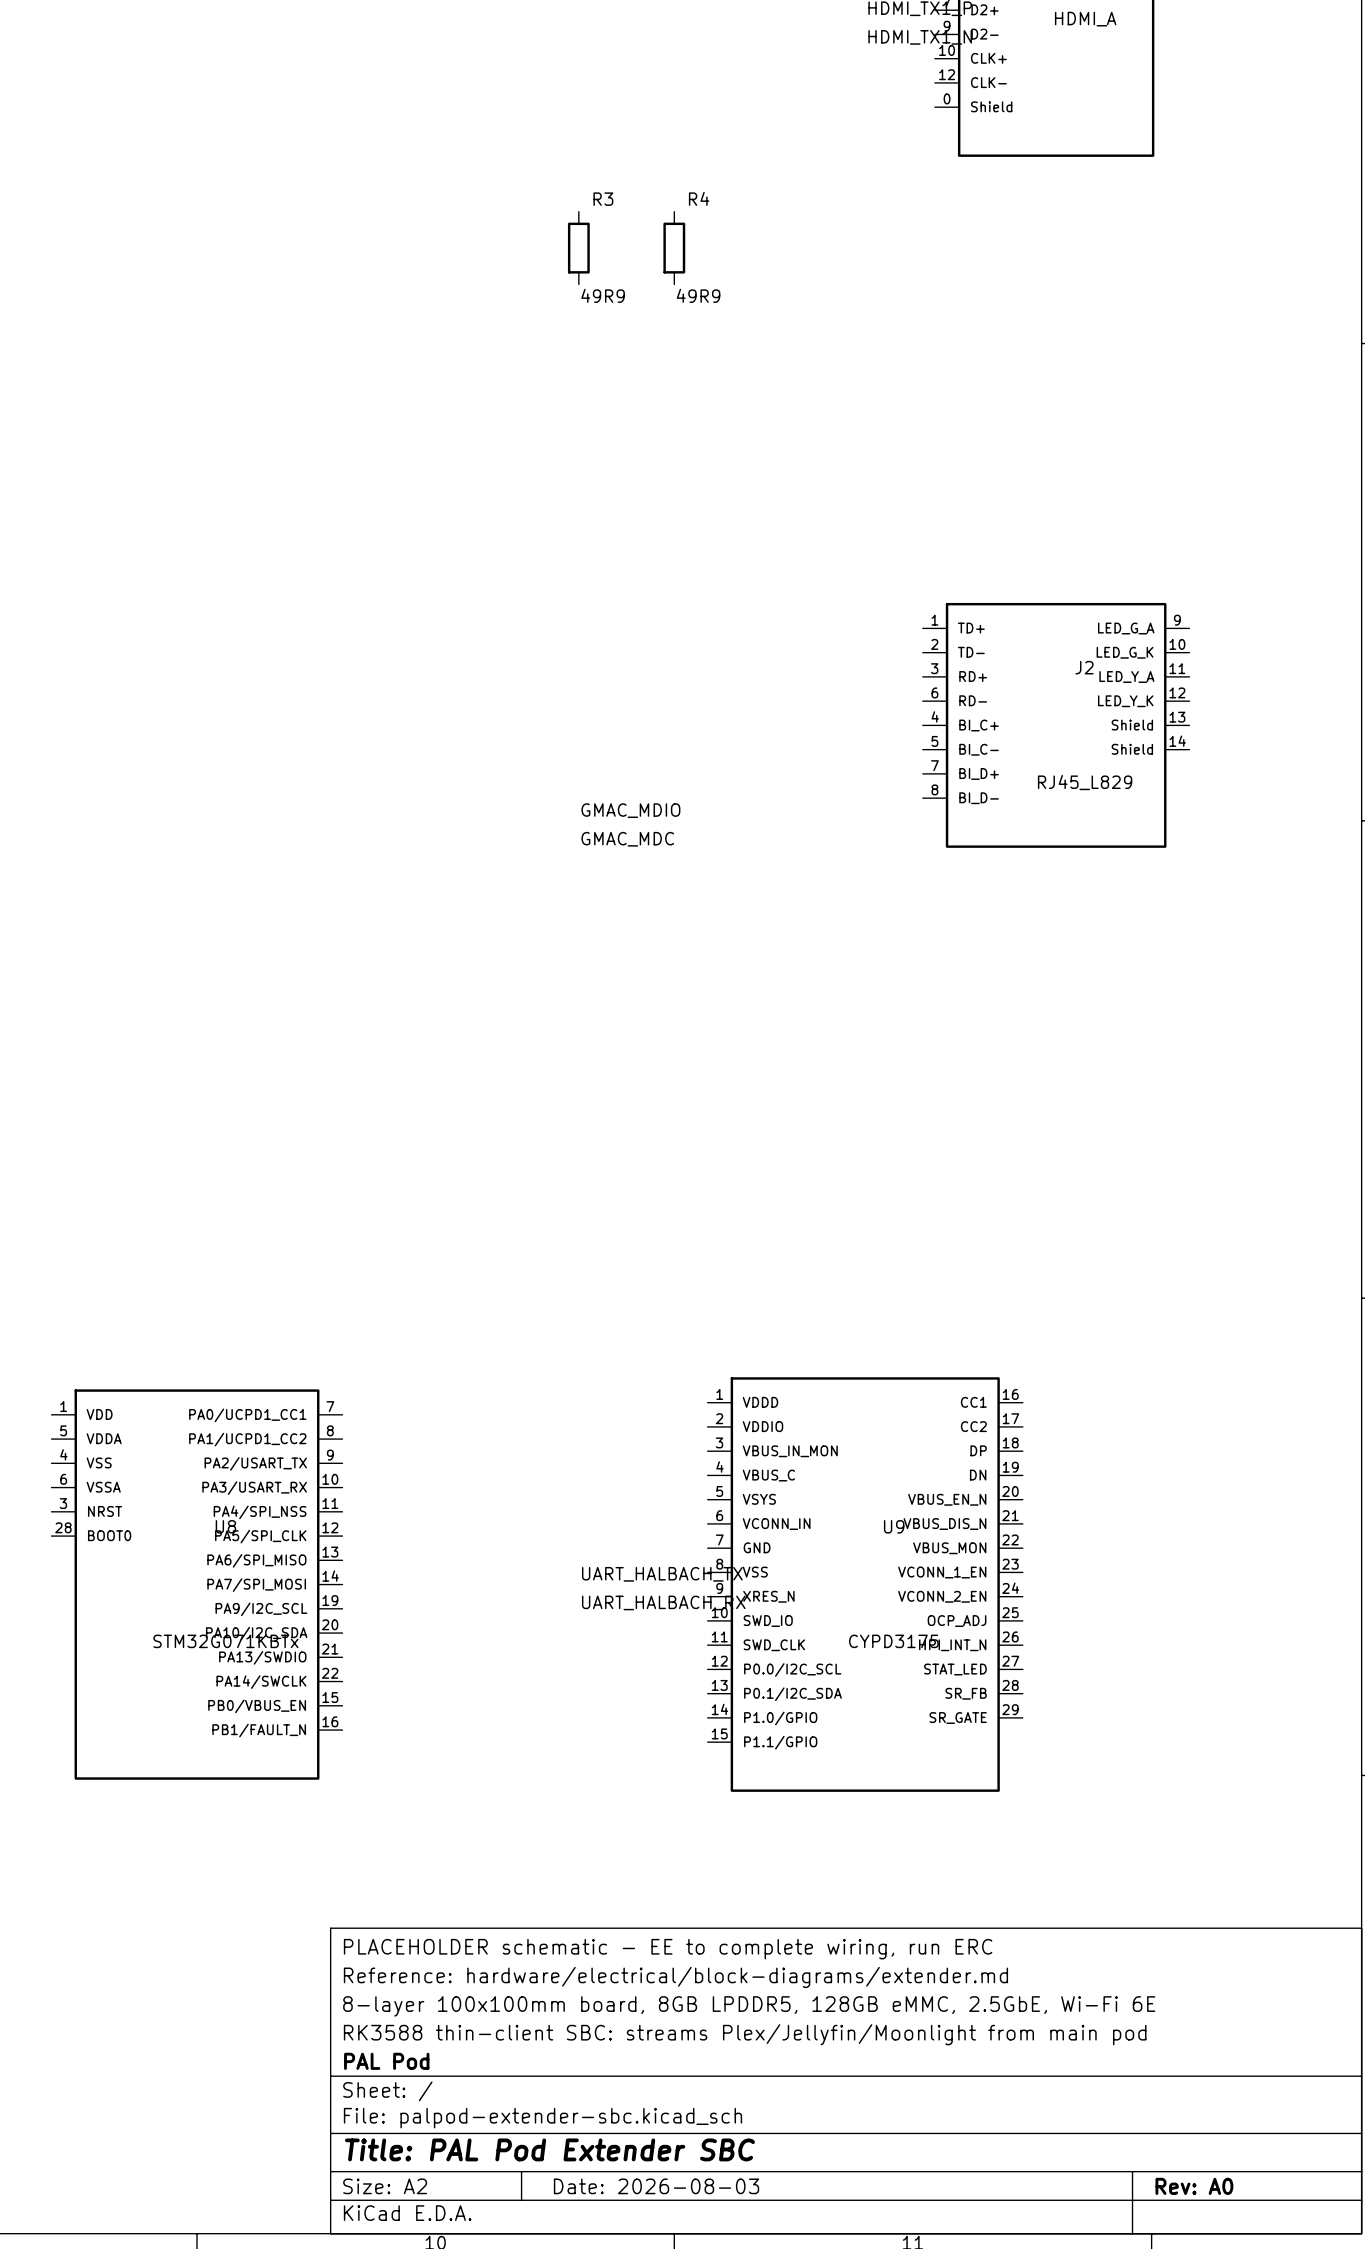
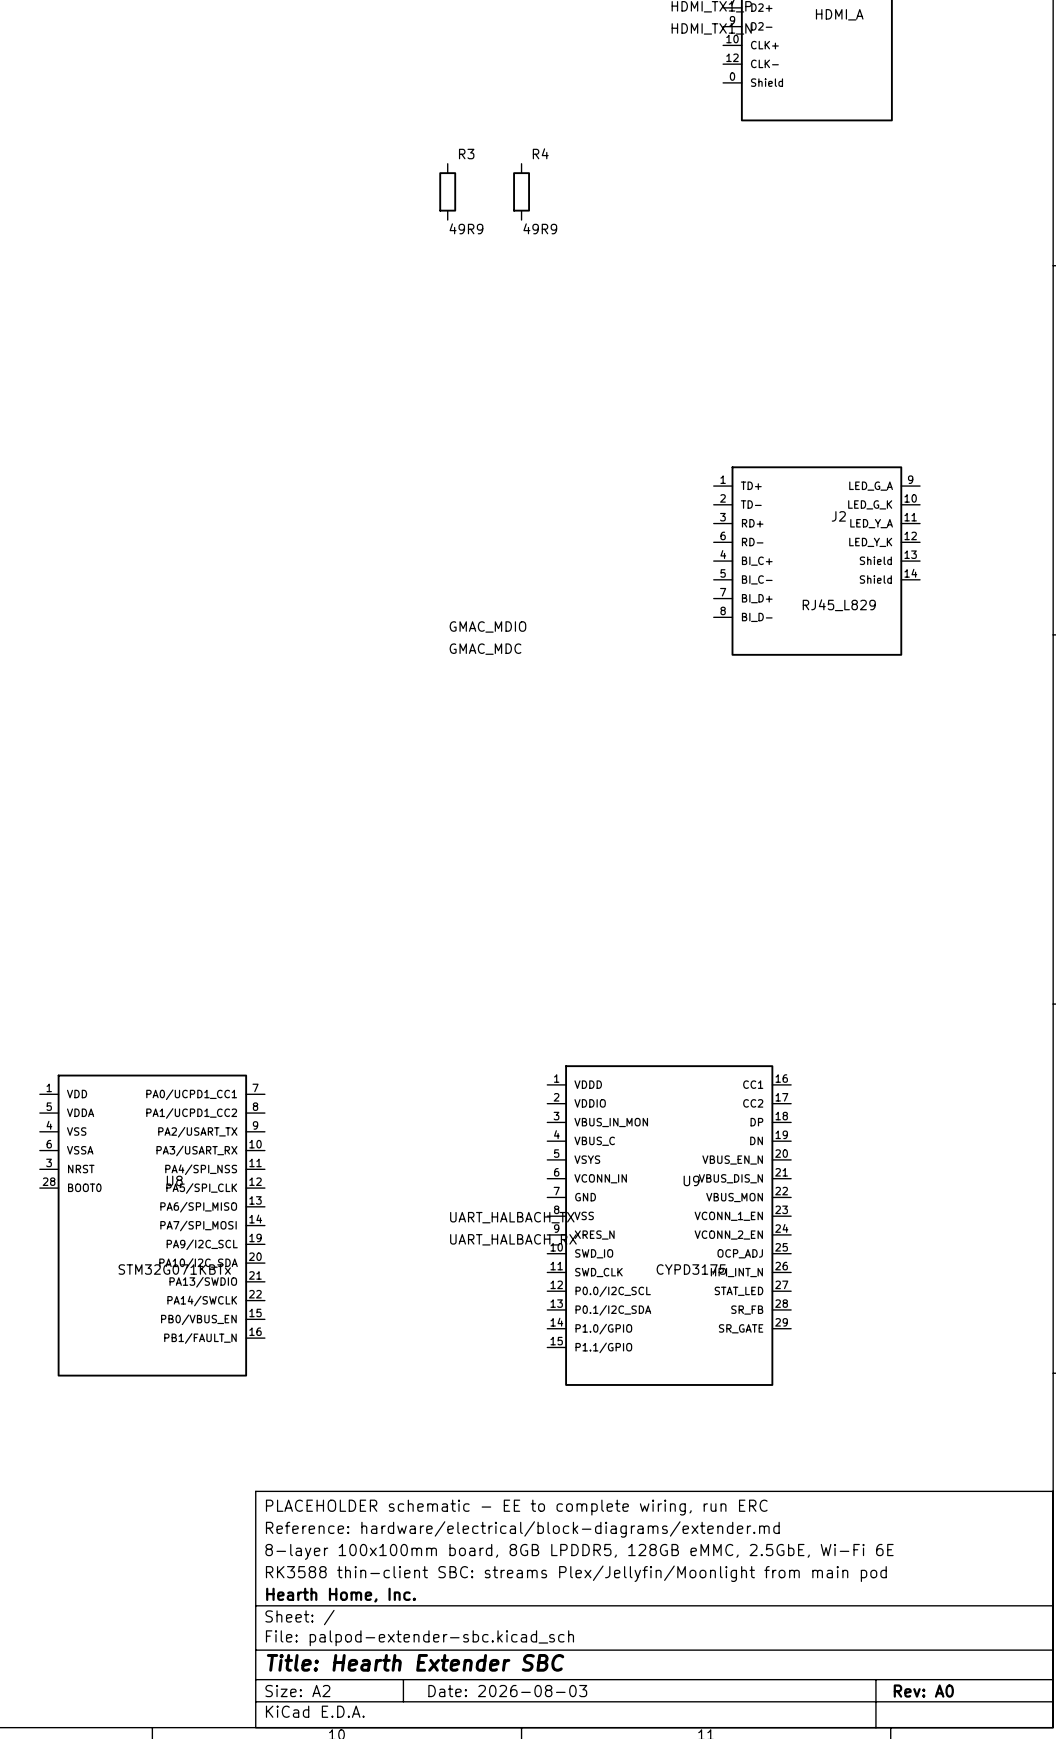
title block: PAL Pod (386, 2061) -> Hearth Home, Inc. (341, 1595)
title block: Title: PAL Pod Extender SBC (550, 2149) -> Title: Hearth Extender SBC (415, 1662)

